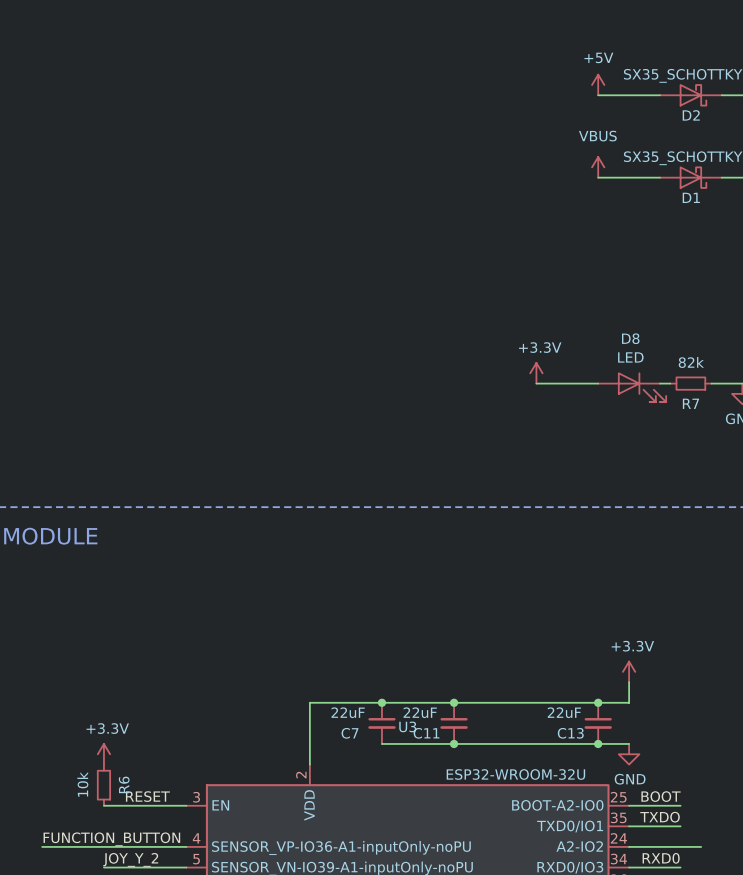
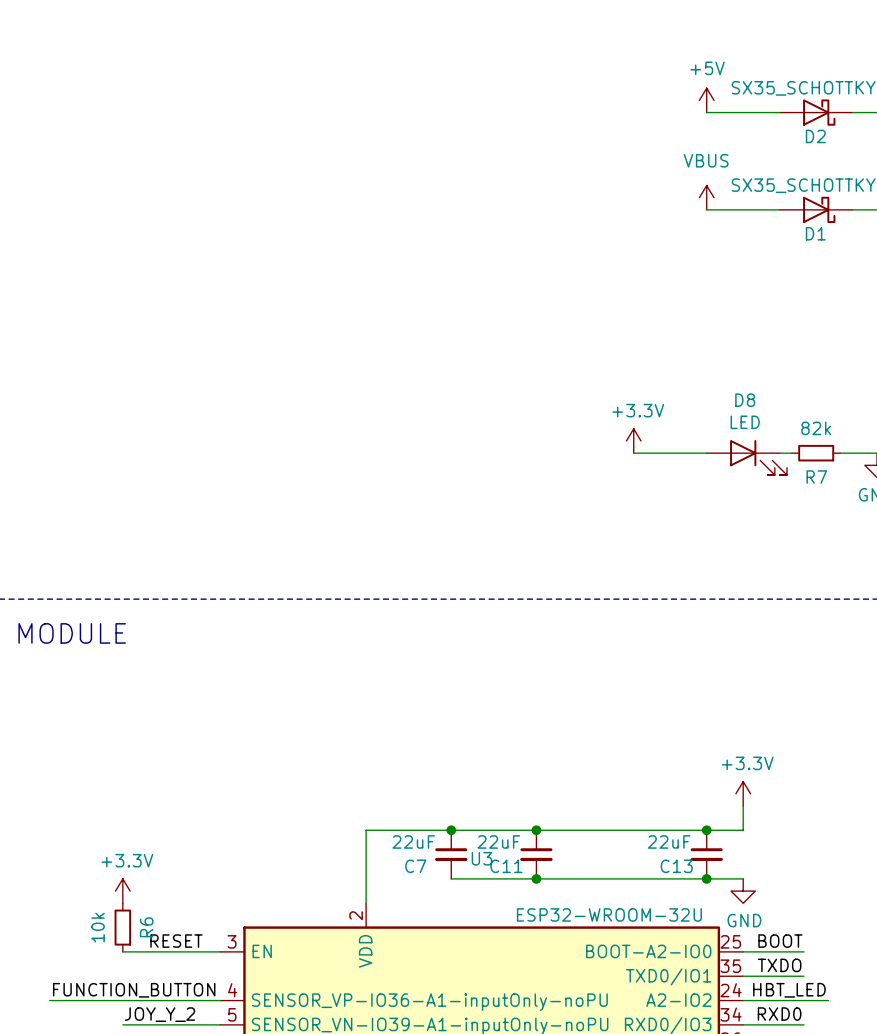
label: none -> HBT_LED (789, 990)

